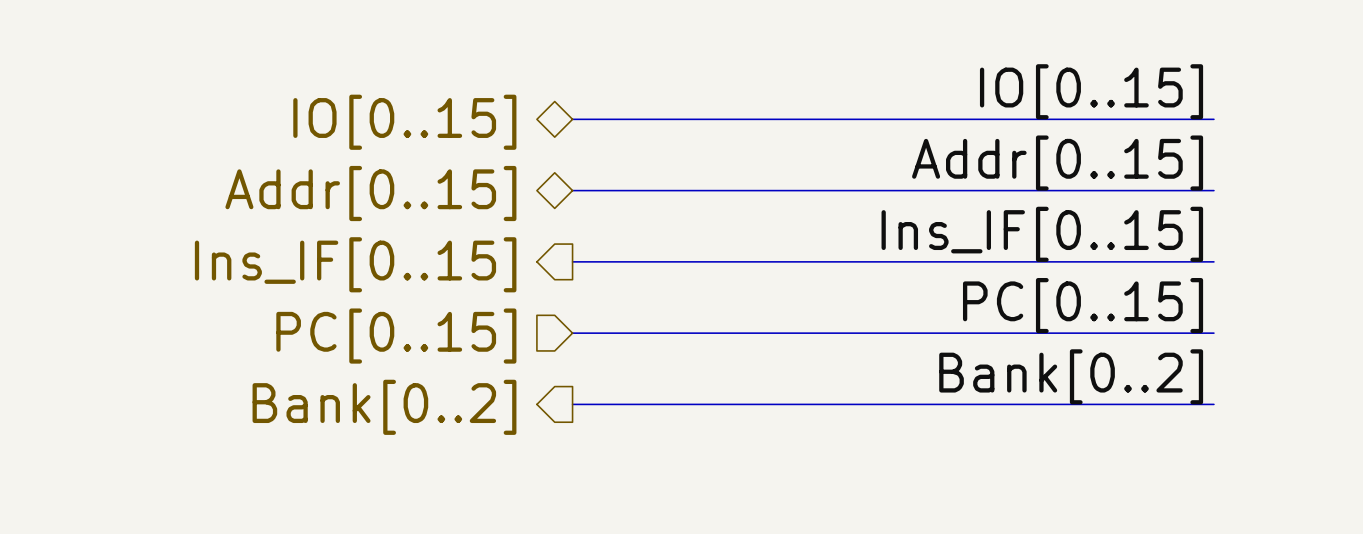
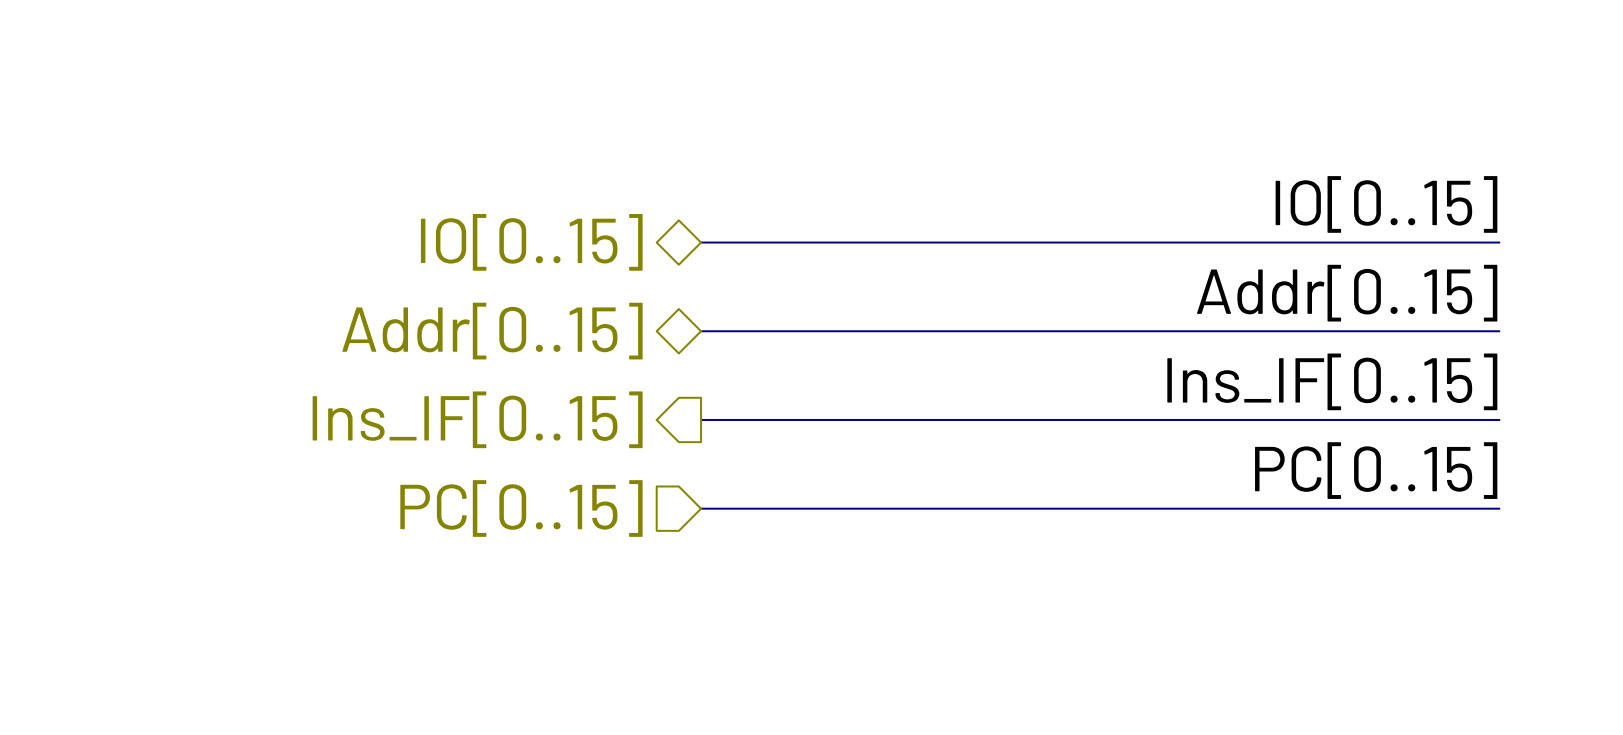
label: Bank[0..2] (1071, 376) -> none
bus: (572, 404) (1213, 404) -> none
hierarchical label: Bank[0..2] (384, 407) -> none

